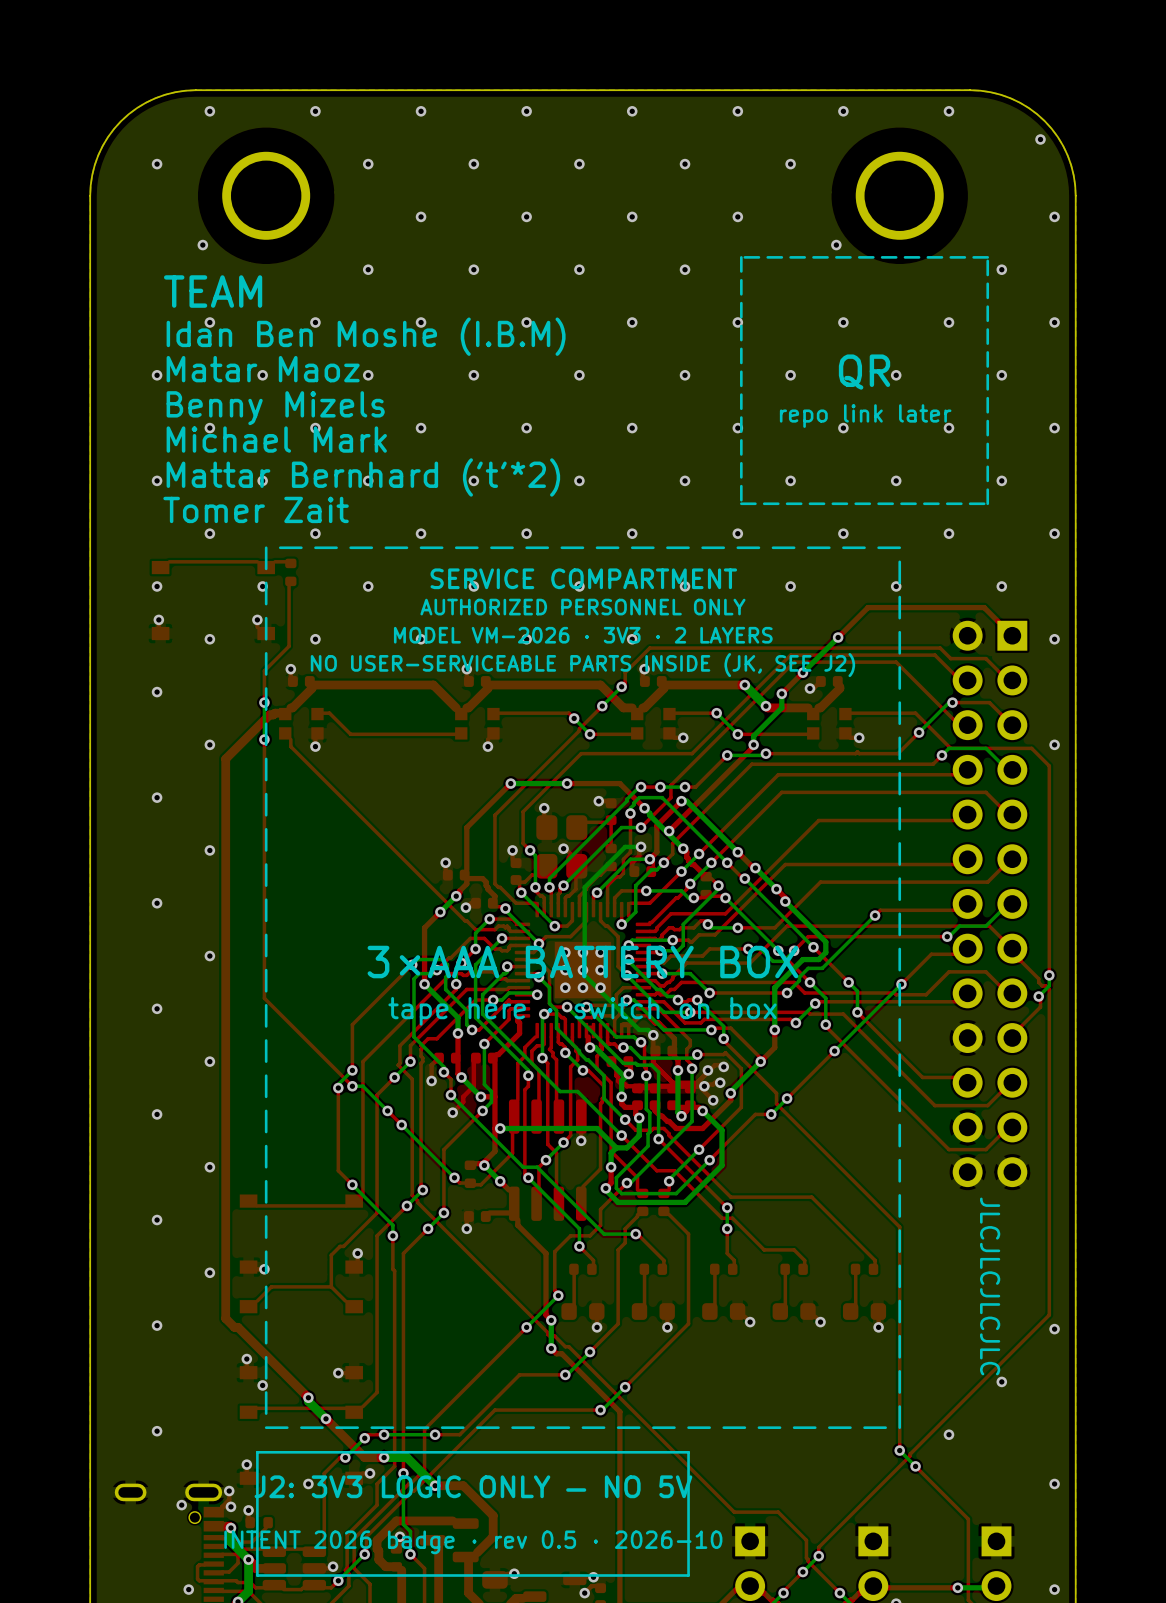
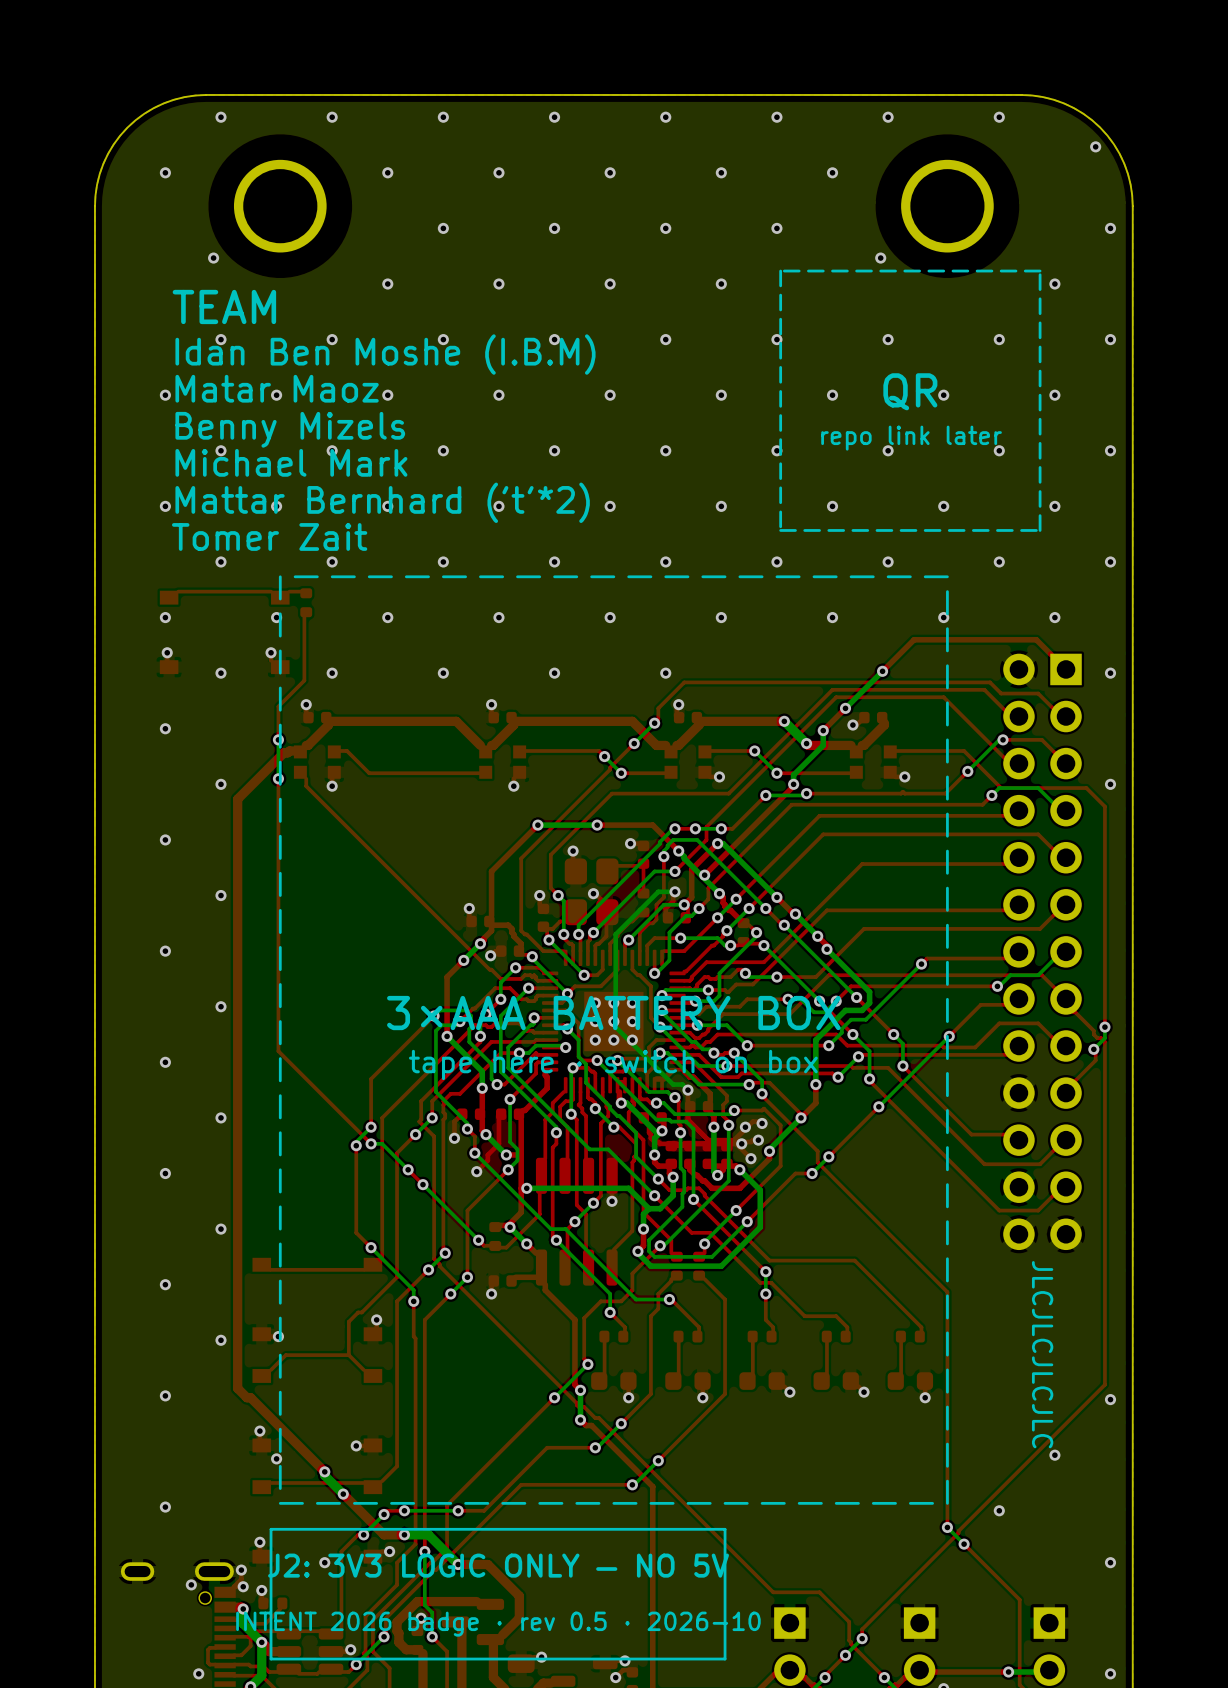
text: SERVICE COMPARTMENT (583, 578) -> none
text: AUTHORIZED PERSONNEL ONLY (582, 607) -> none
text: MODEL VM-2026 · 3V3 · 2 LAYERS (583, 635) -> none
text: NO USER-SERVICEABLE PARTS INSIDE (JK, SEE J2) (582, 665) -> none

